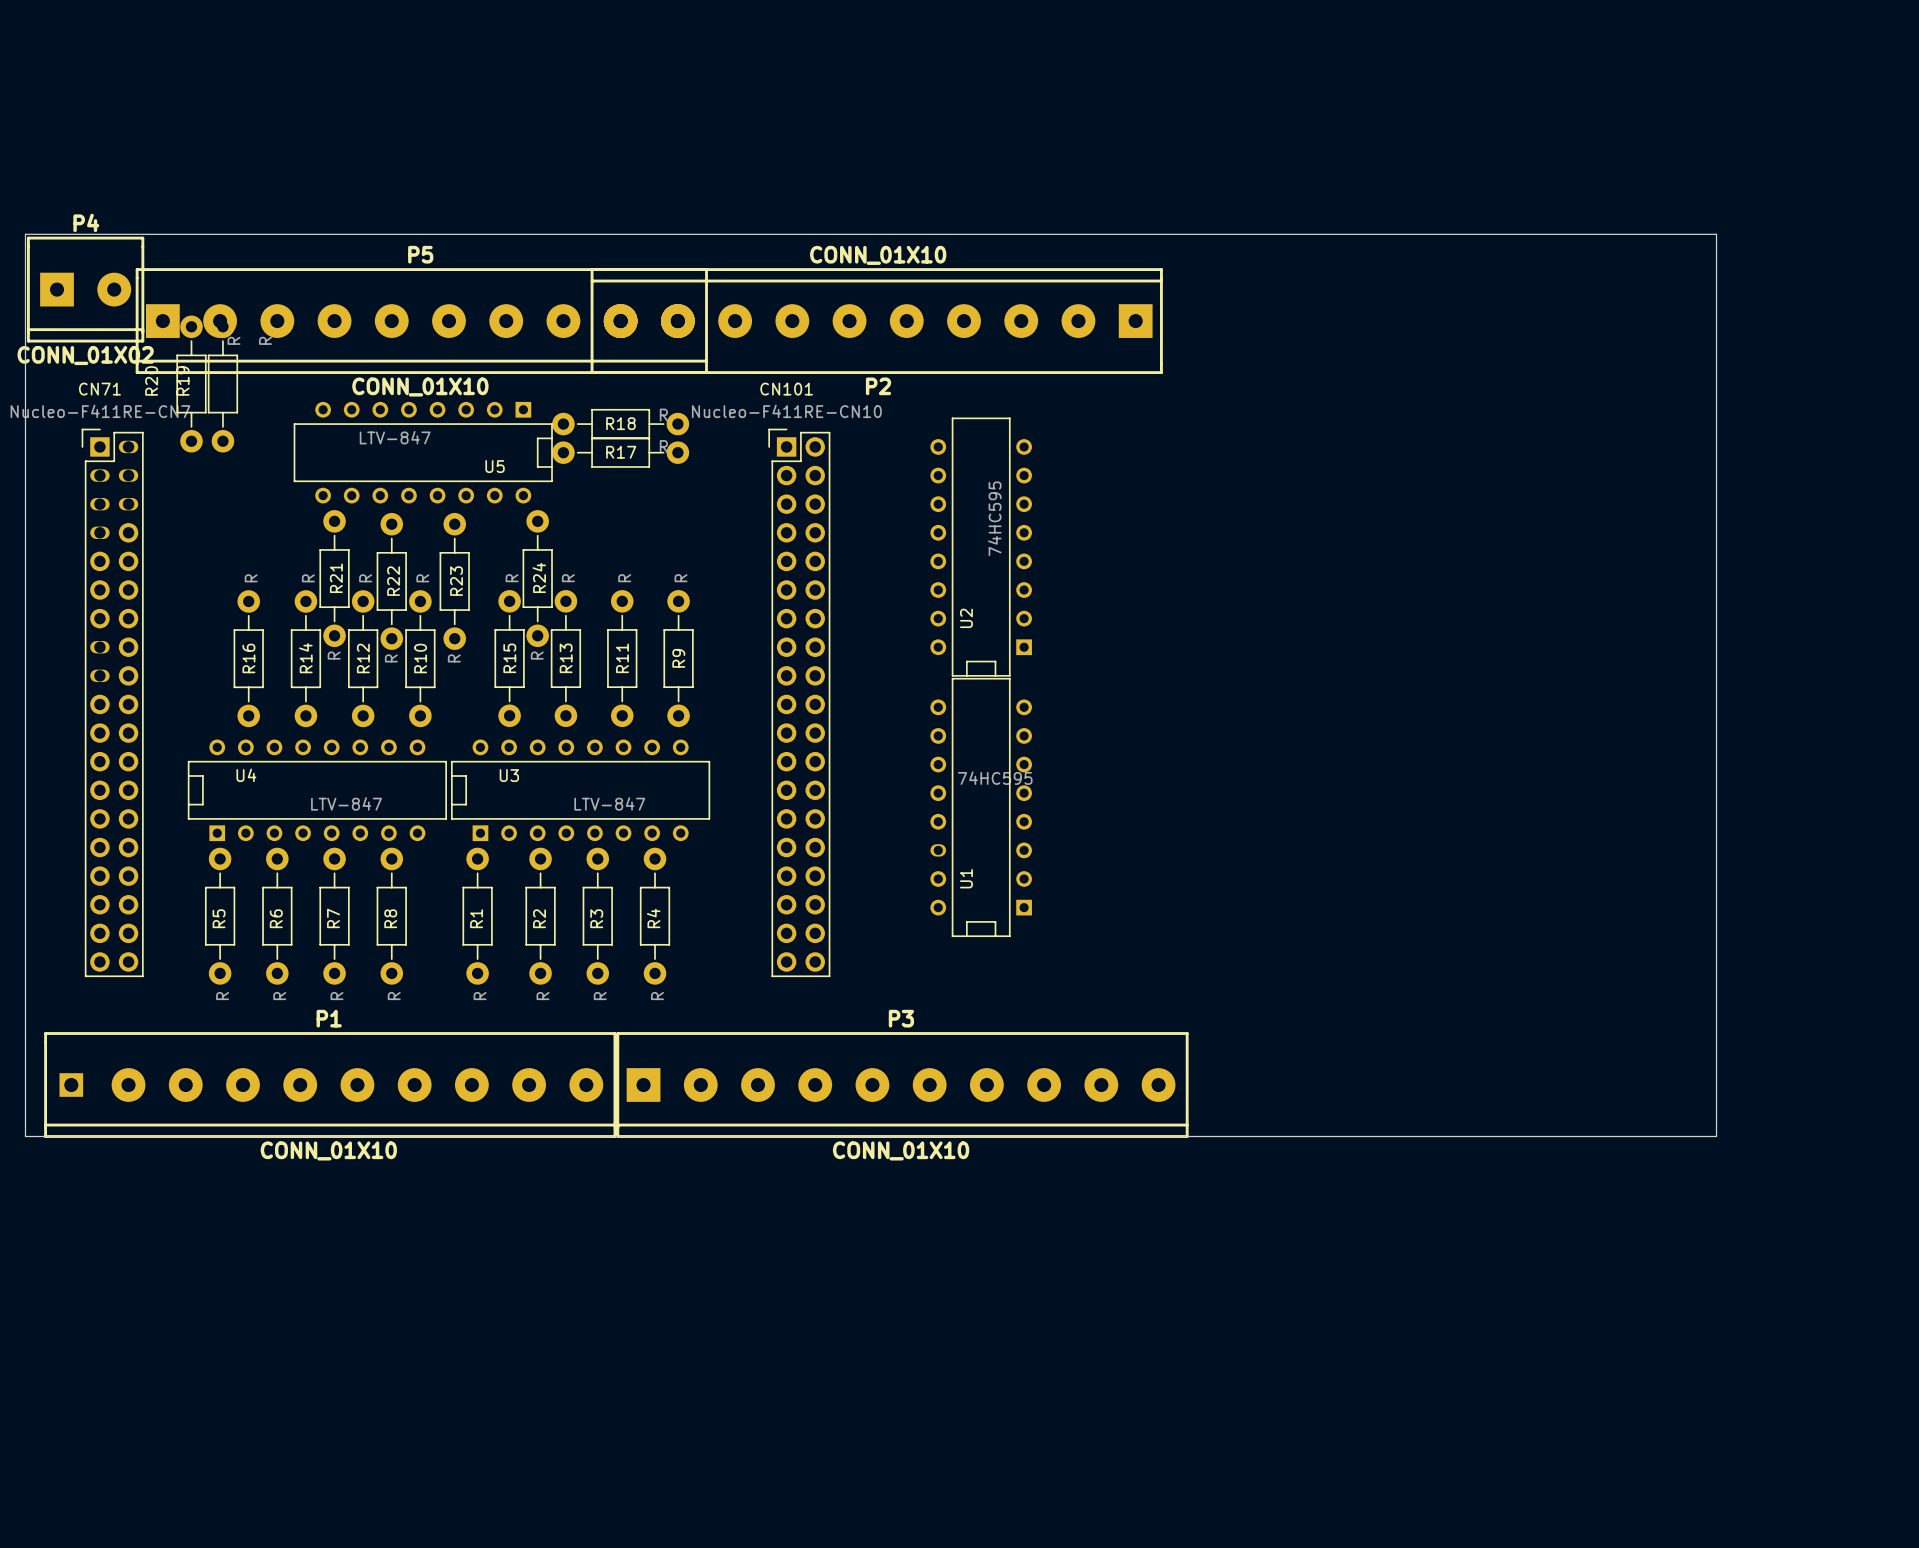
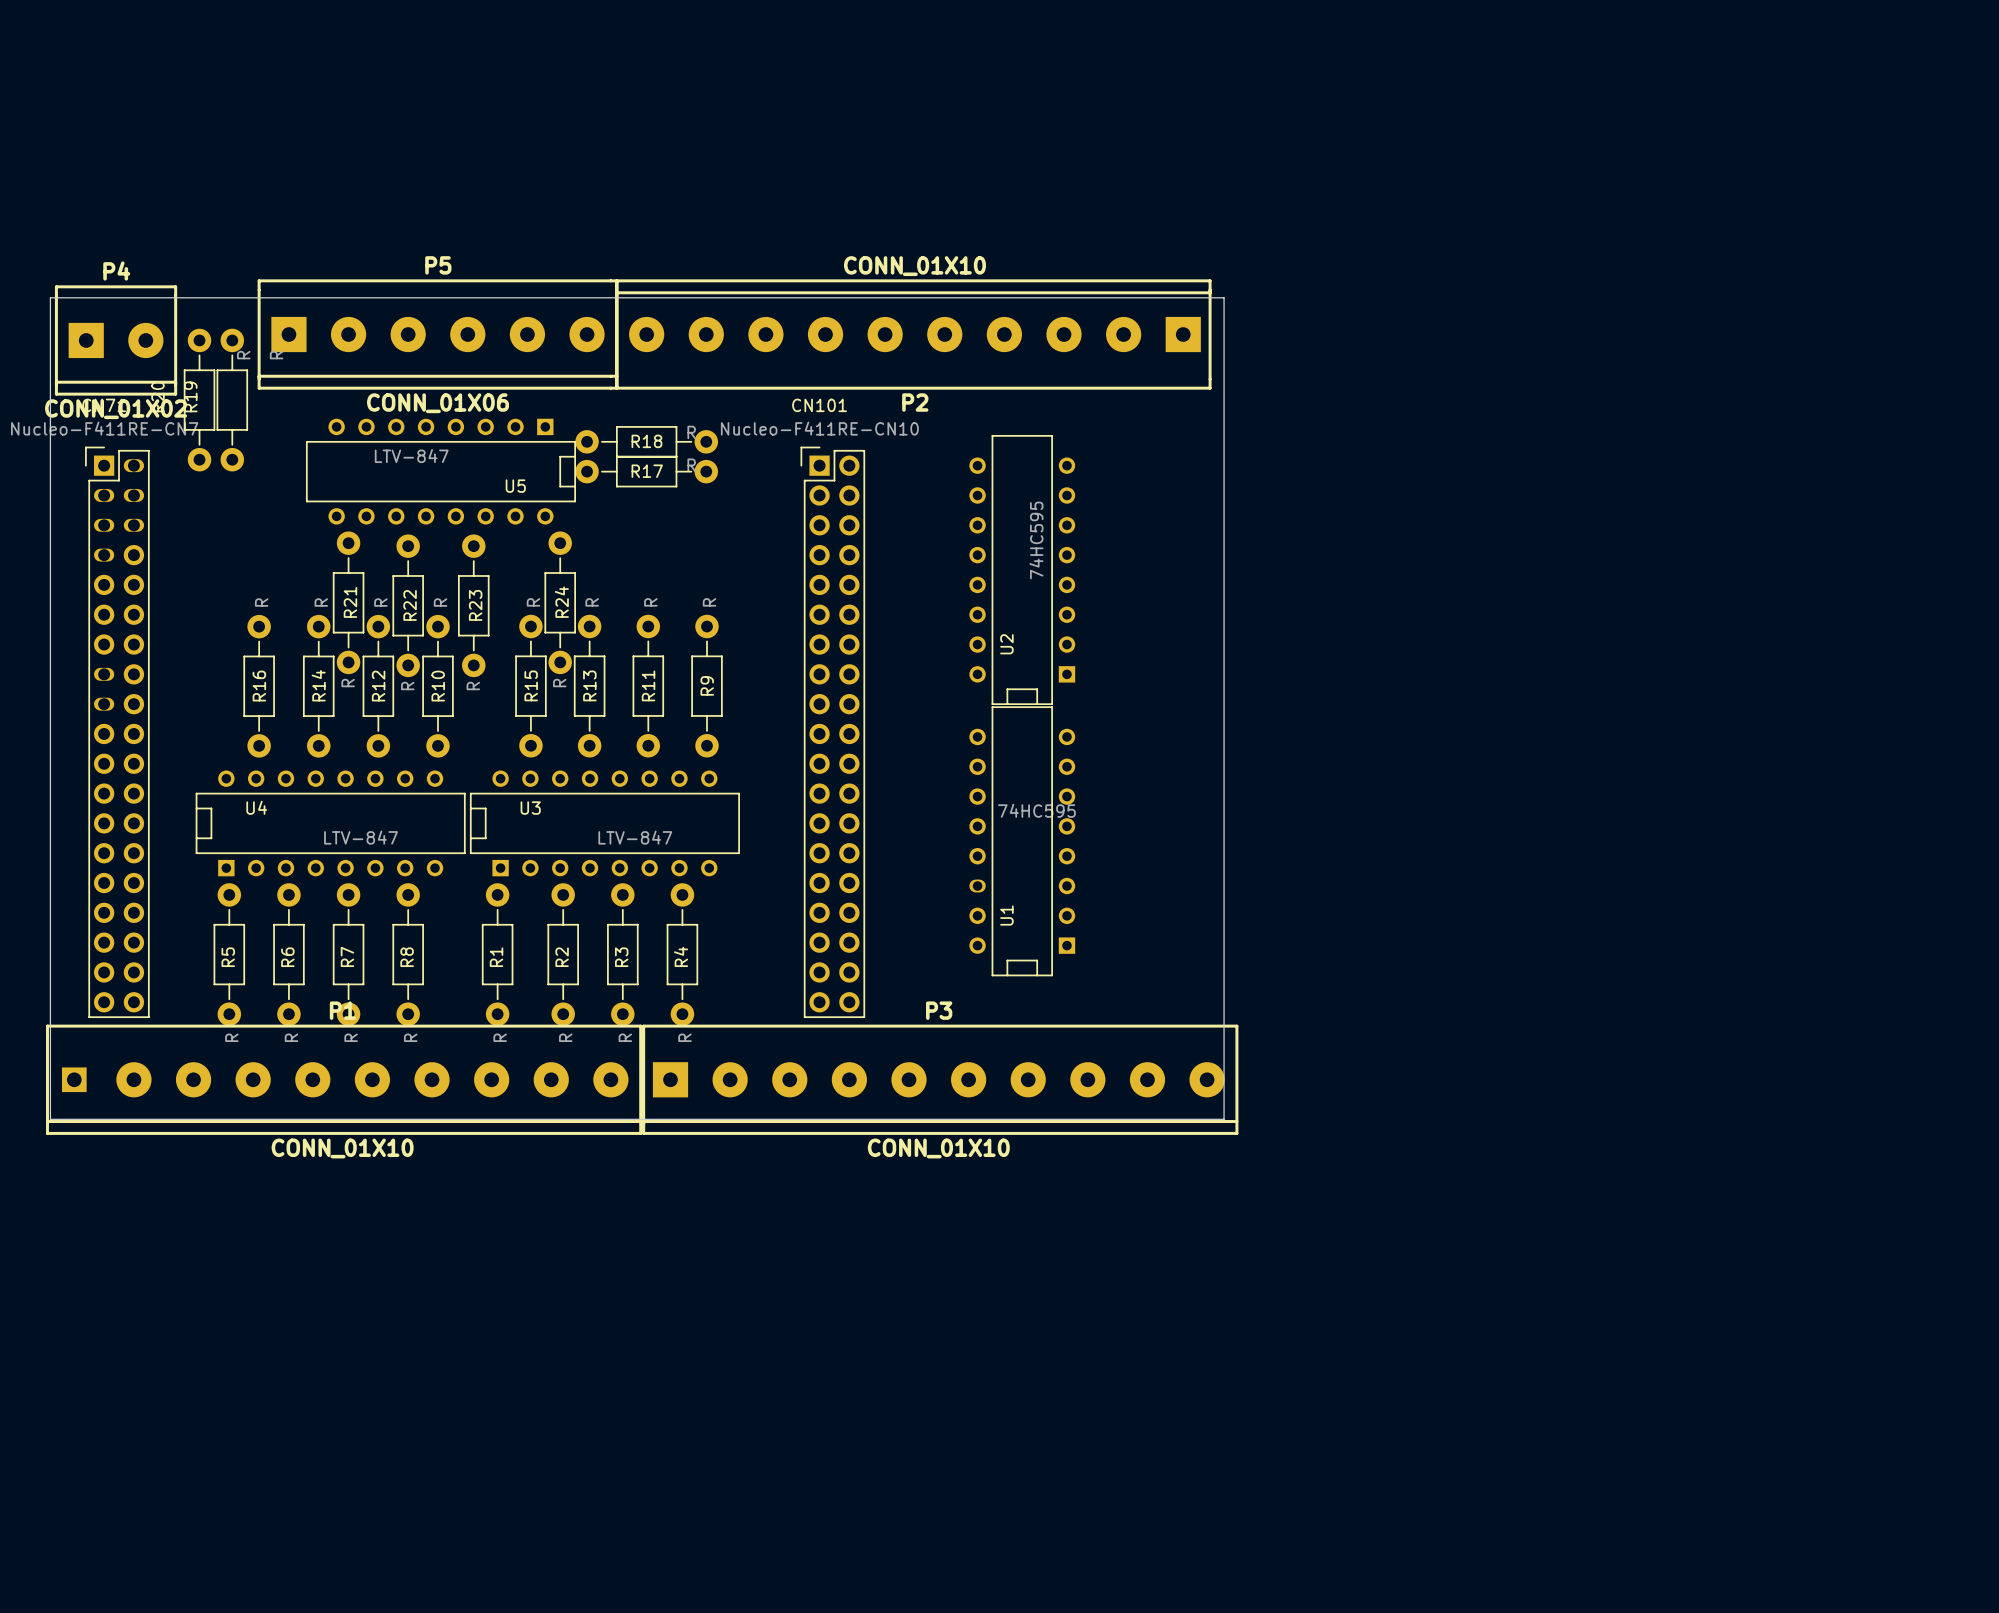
board edge: (25, 234) (1716, 234) (1716, 1136) (25, 1136) (25, 234) -> (50, 297) (50, 1119) (1224, 1119) (1224, 297) (50, 297)
P5 footprint: [135, 268, 708, 375] -> [257, 279, 619, 390]
P4 position: (85, 289) -> (116, 340)
P5 value: CONN_01X10 (420, 387) -> CONN_01X06 (437, 403)
P1 position: (330, 1085) -> (344, 1079)
P3 position: (902, 1085) -> (940, 1079)

